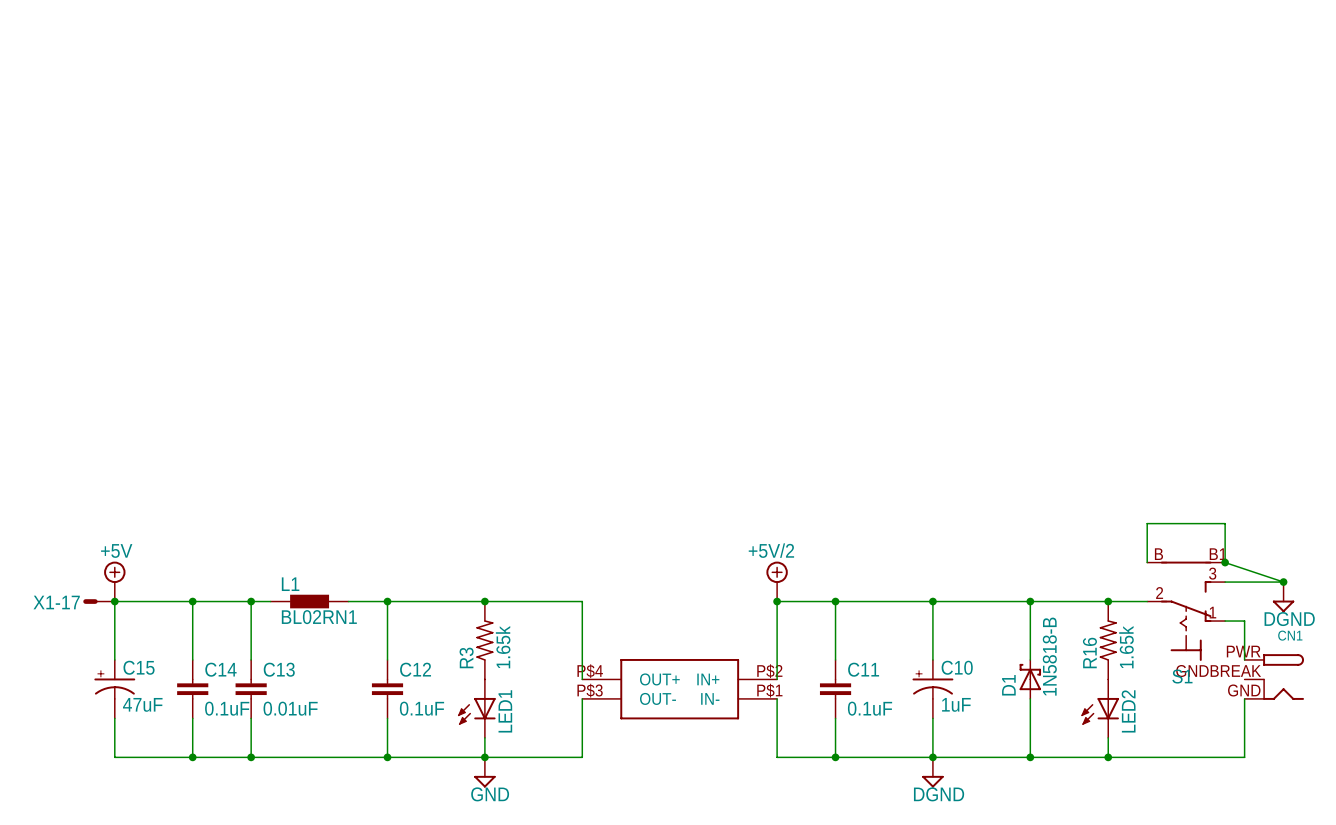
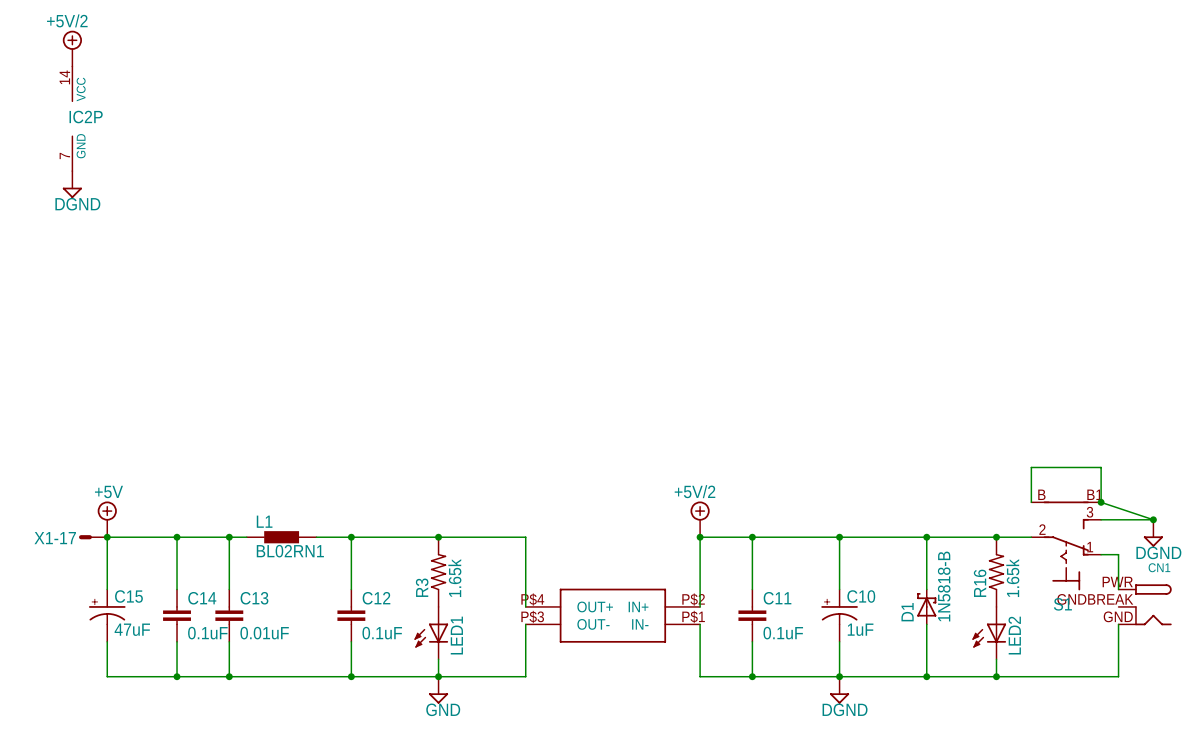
power symbol: none -> +5V/2 (72, 48)
IC2P: none -> (72, 118)
power symbol: none -> DGND (72, 184)

